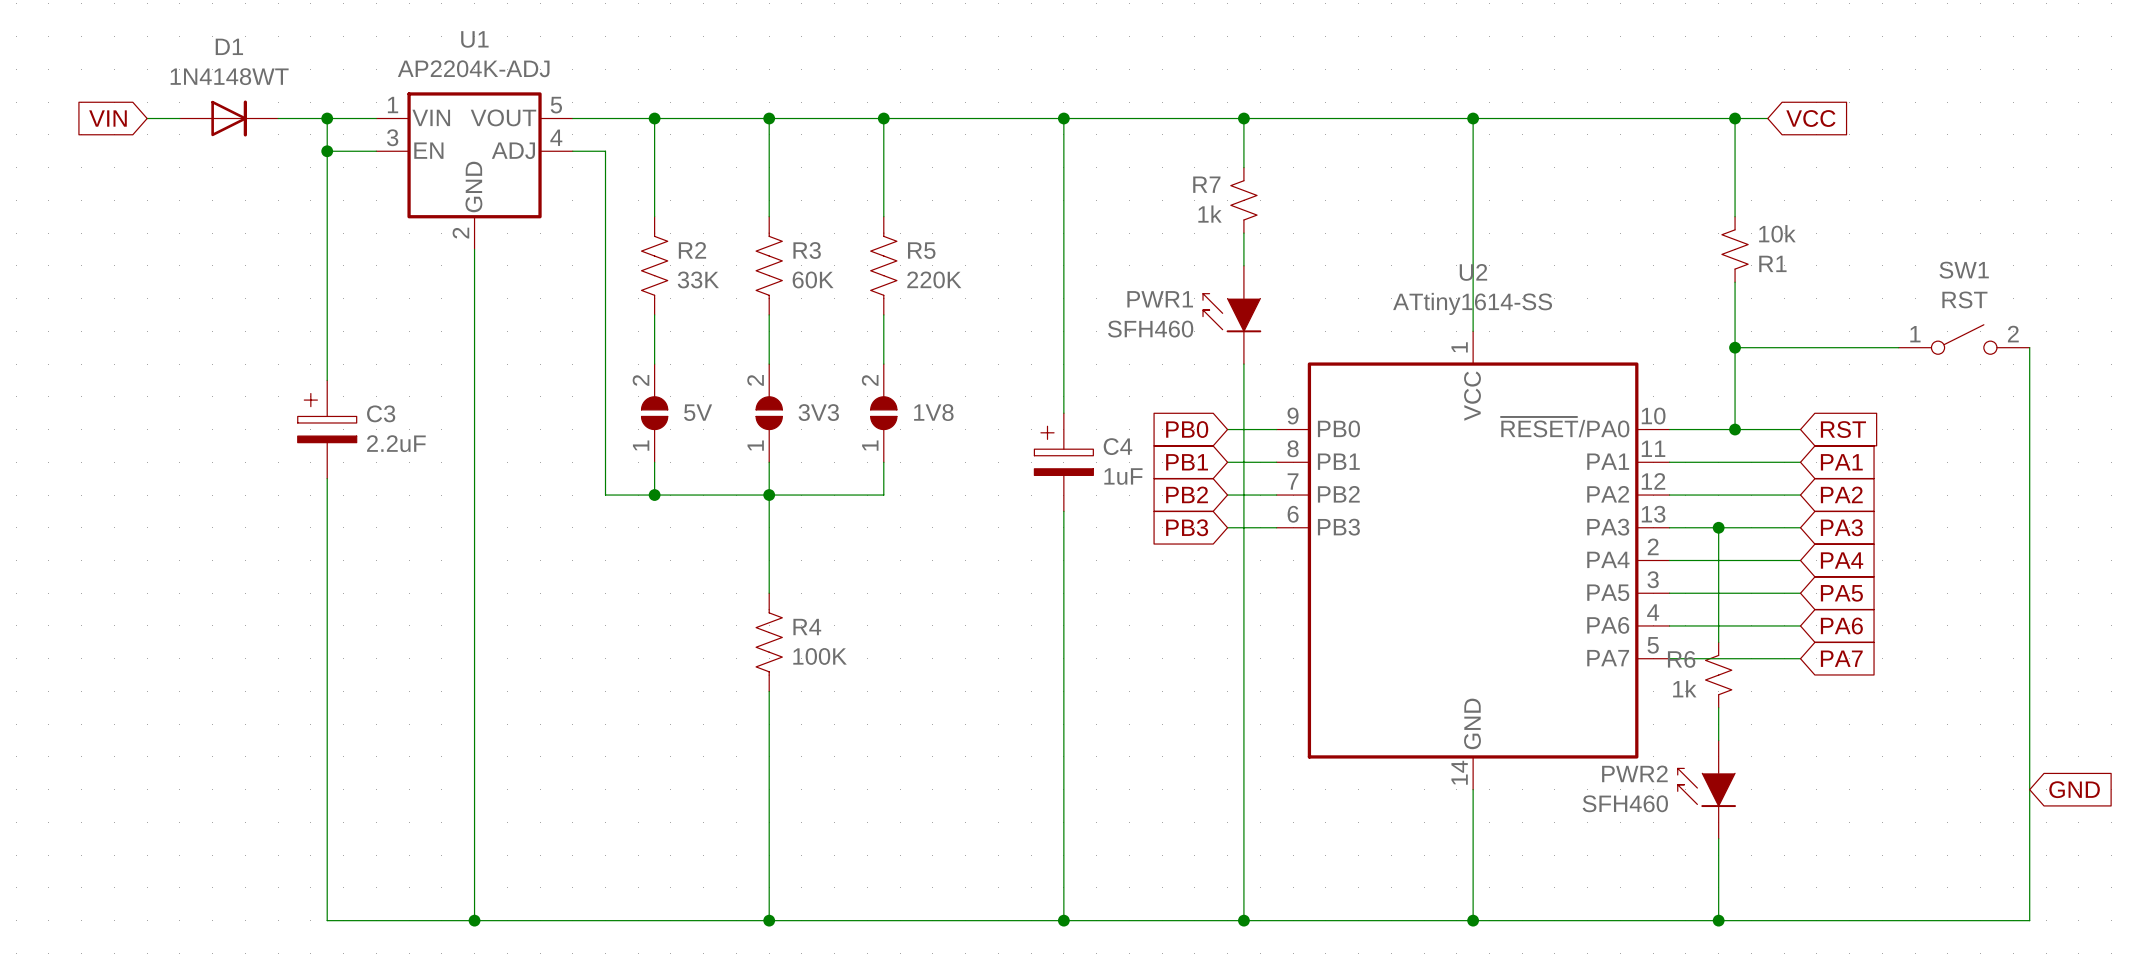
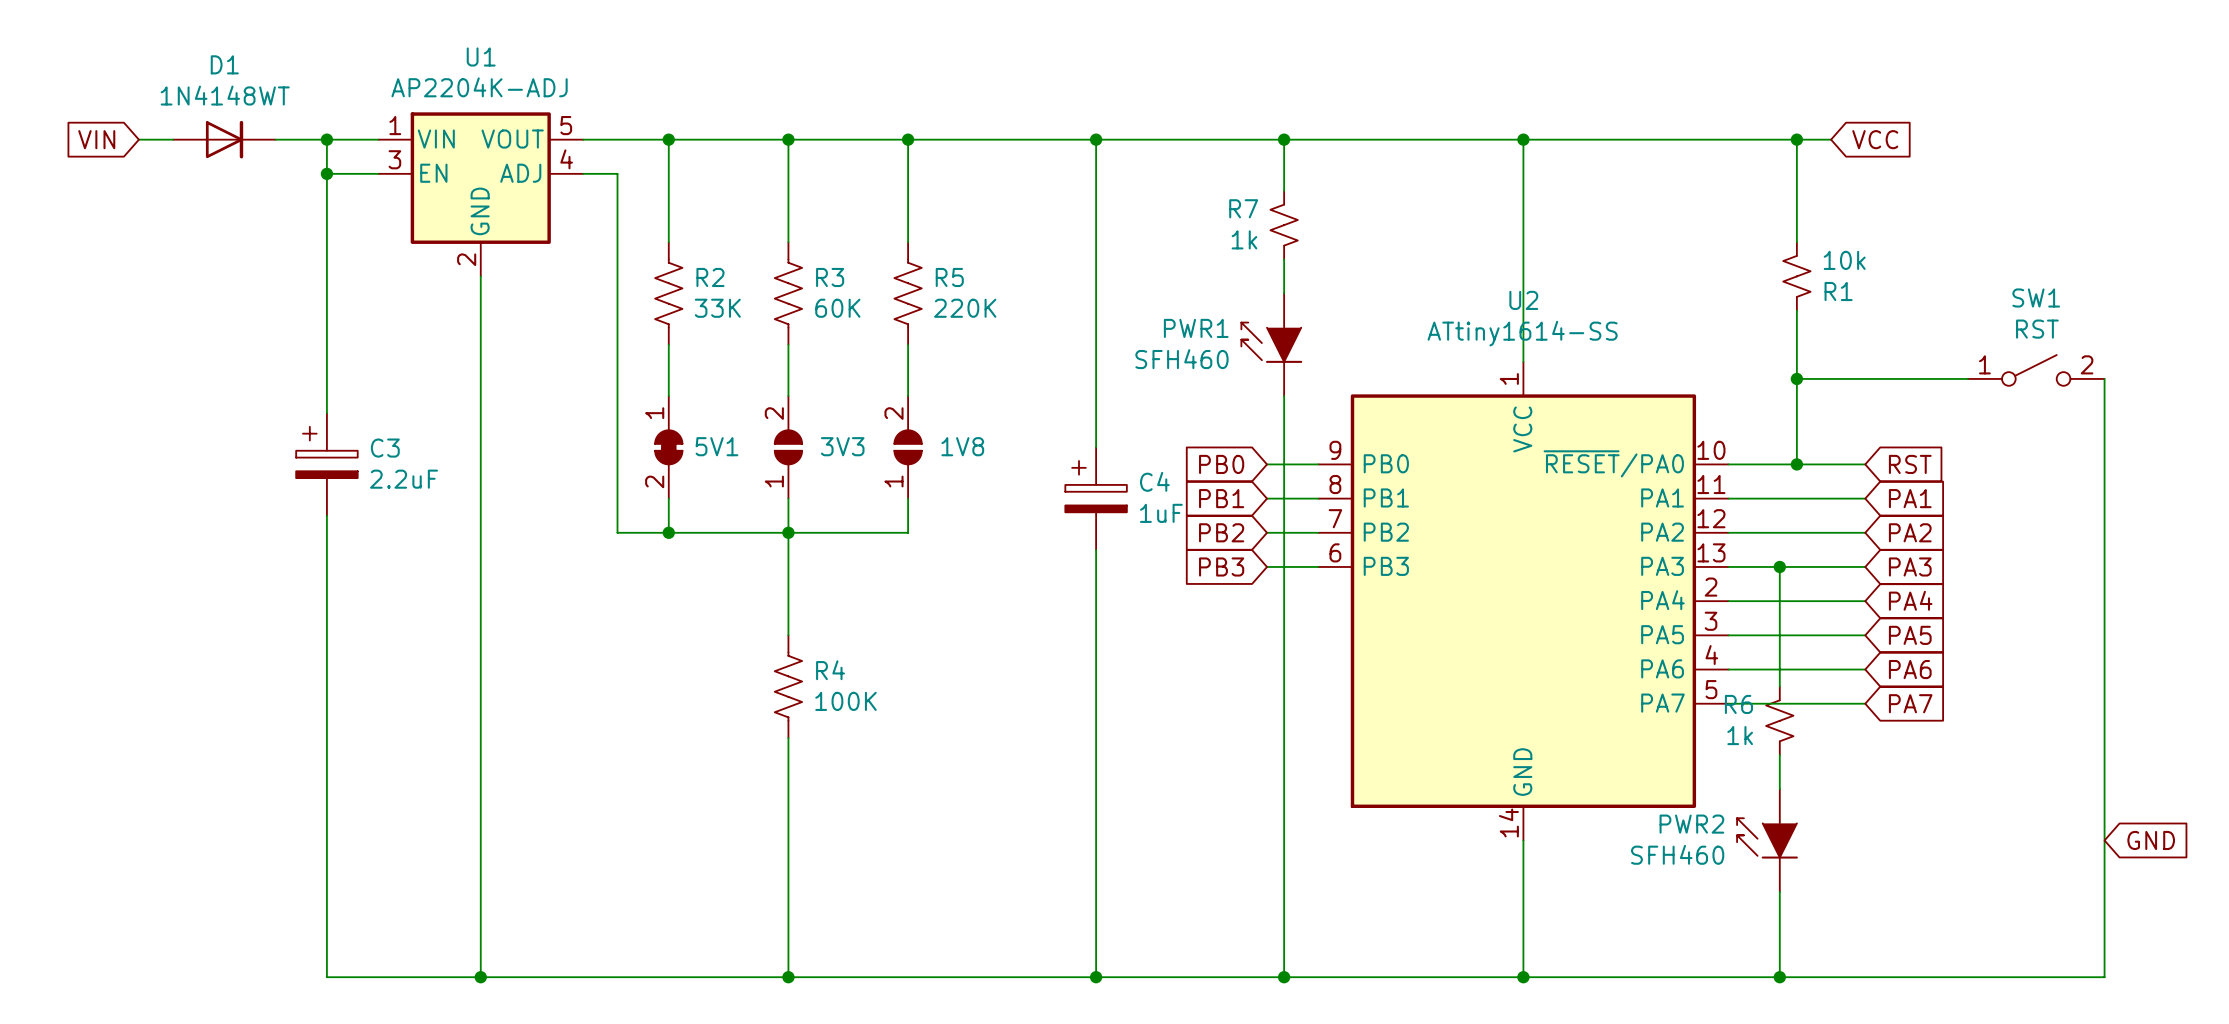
5V: (654, 413) -> none
5V1: none -> (668, 447)

